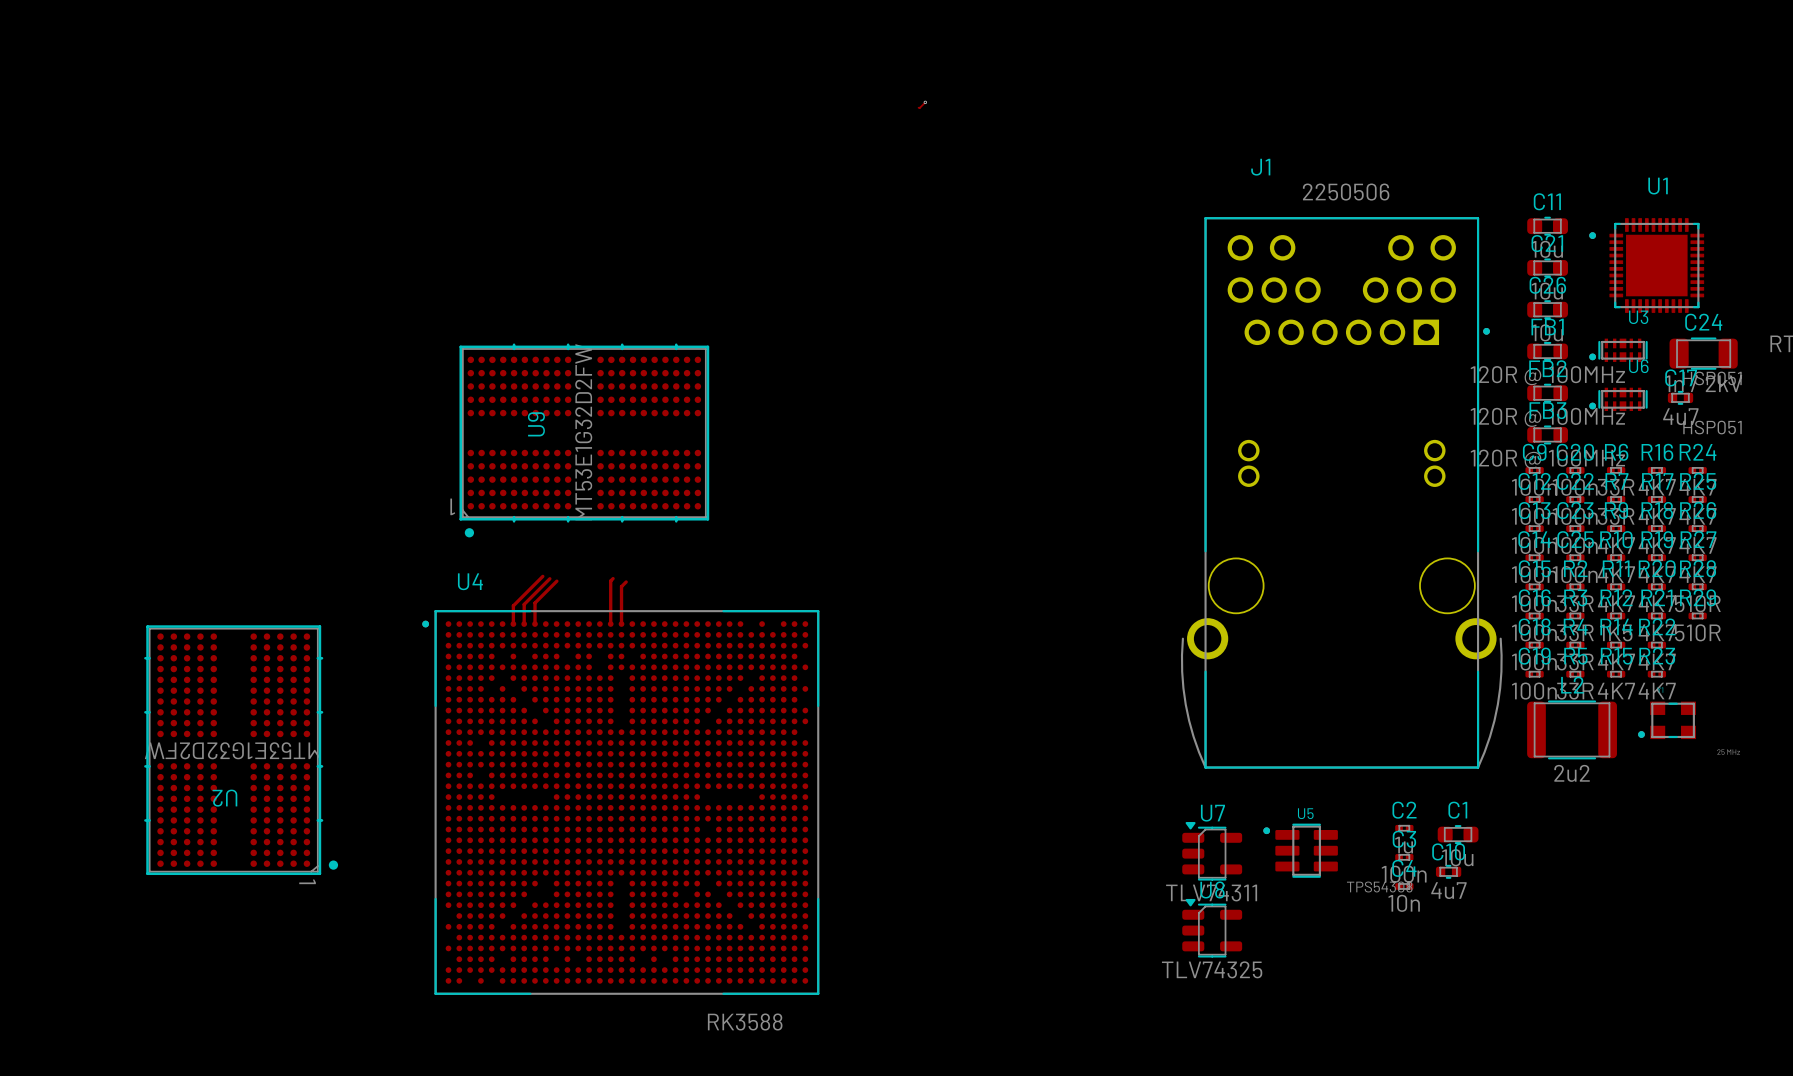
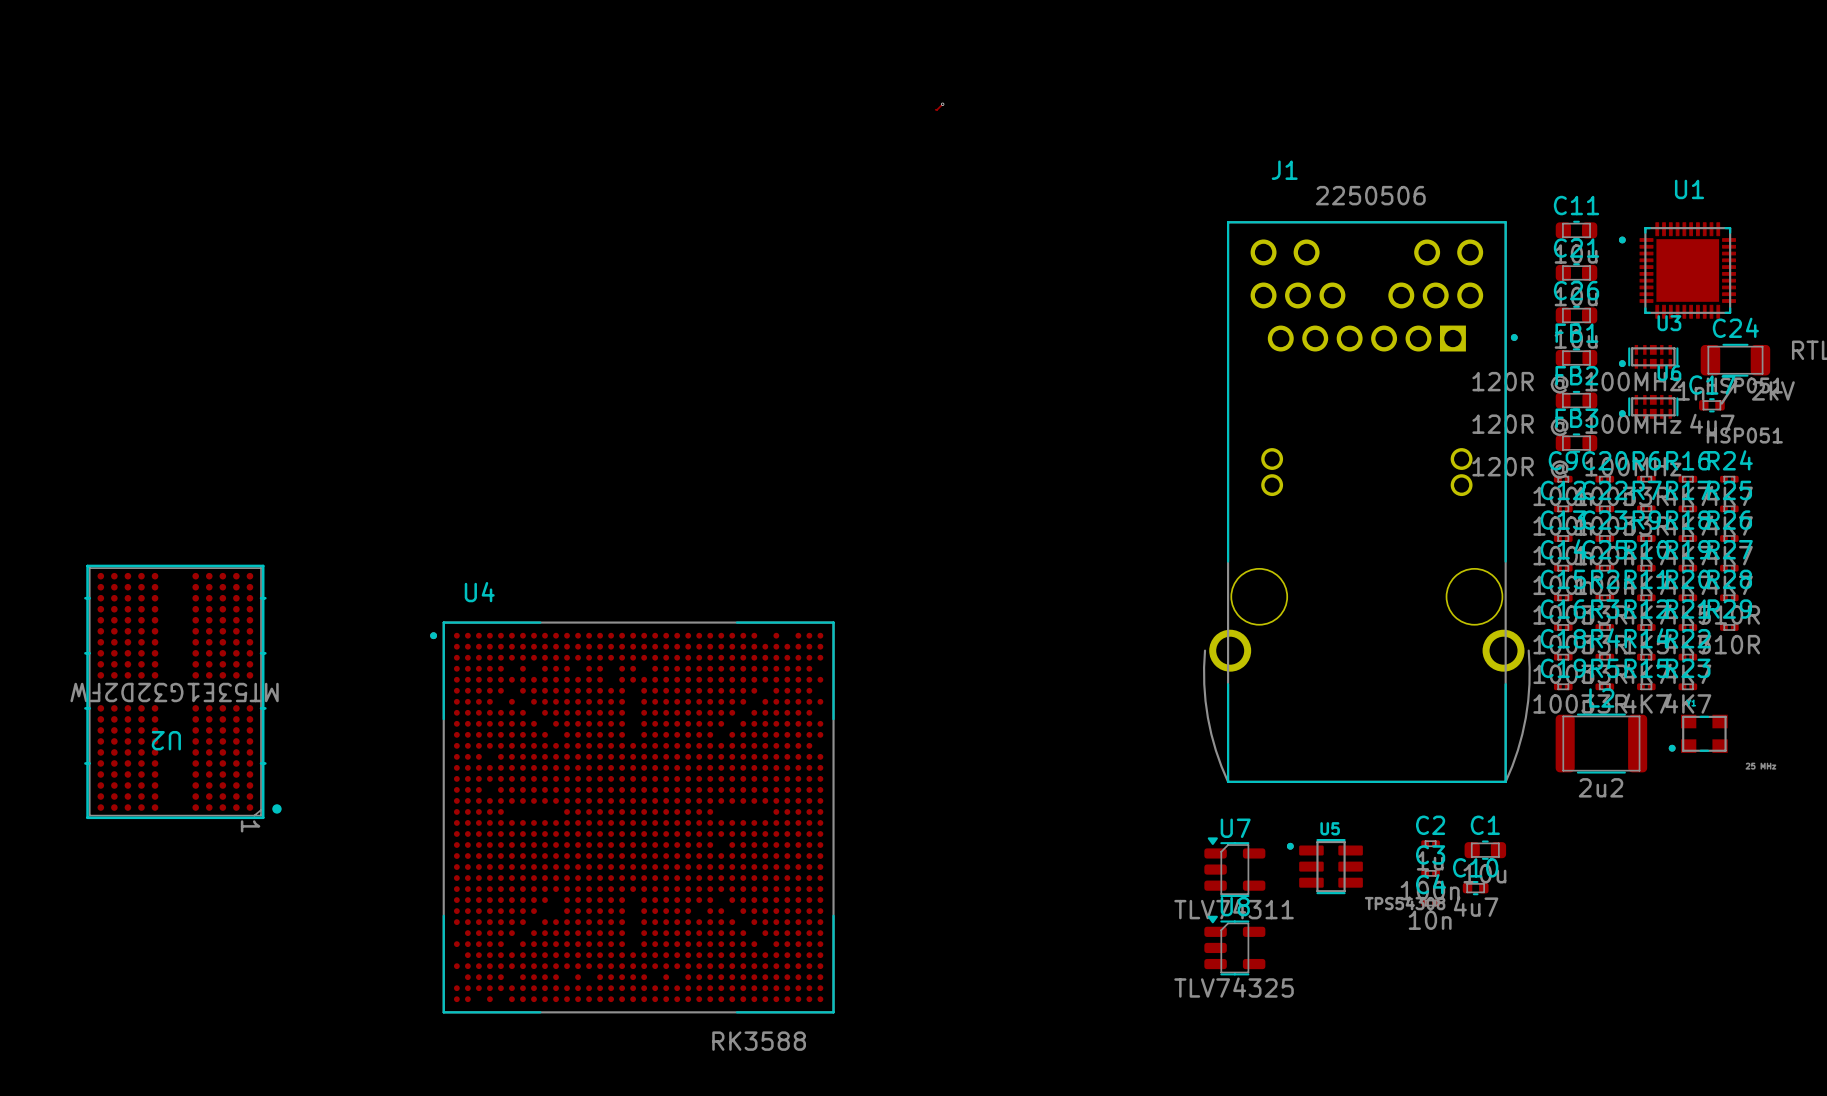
U9: MT53E1G32D2FW (584, 440) -> none
top track: (542, 576) (513, 605) (513, 624) -> none
top track: (549, 578) (524, 604) (524, 624) -> none
top track: (613, 578) (610, 580) (610, 624) -> none
top track: (556, 581) (535, 603) (535, 624) -> none
top track: (626, 581) (621, 586) (621, 624) -> none
U2 position: (241, 750) -> (182, 691)

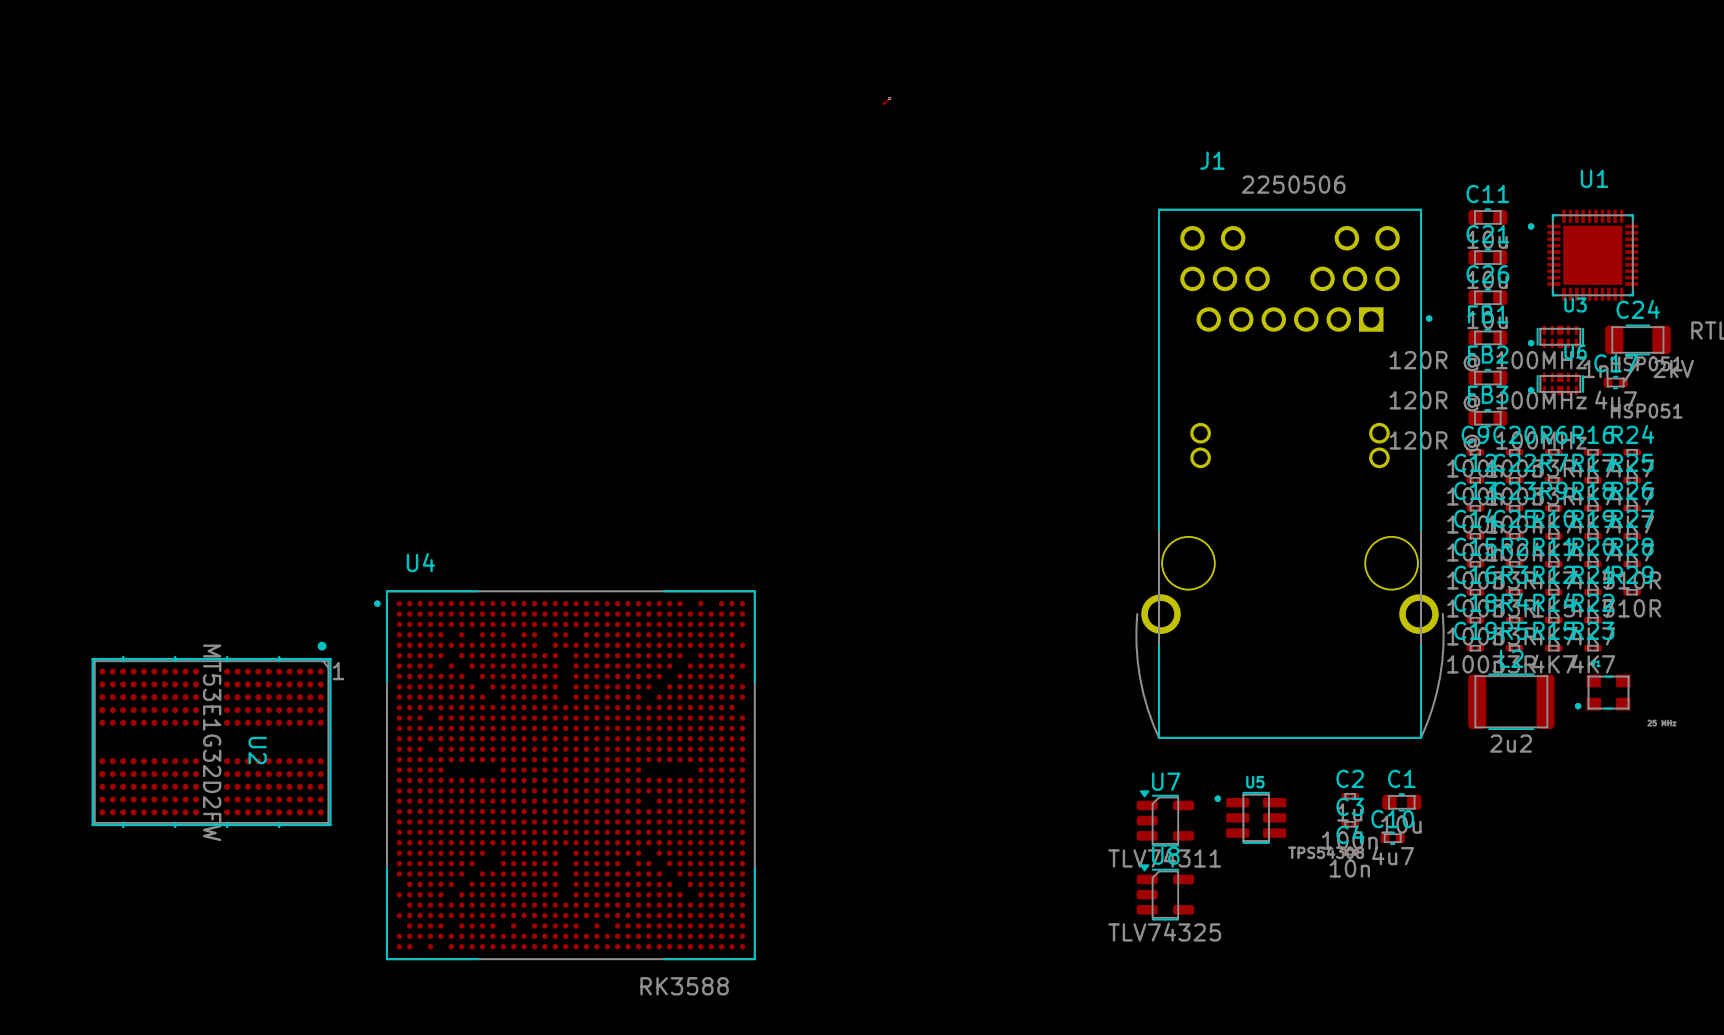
U2 rotation: 0° (182, 691) -> 90° counterclockwise (211, 734)
U4 position: (632, 817) -> (564, 775)

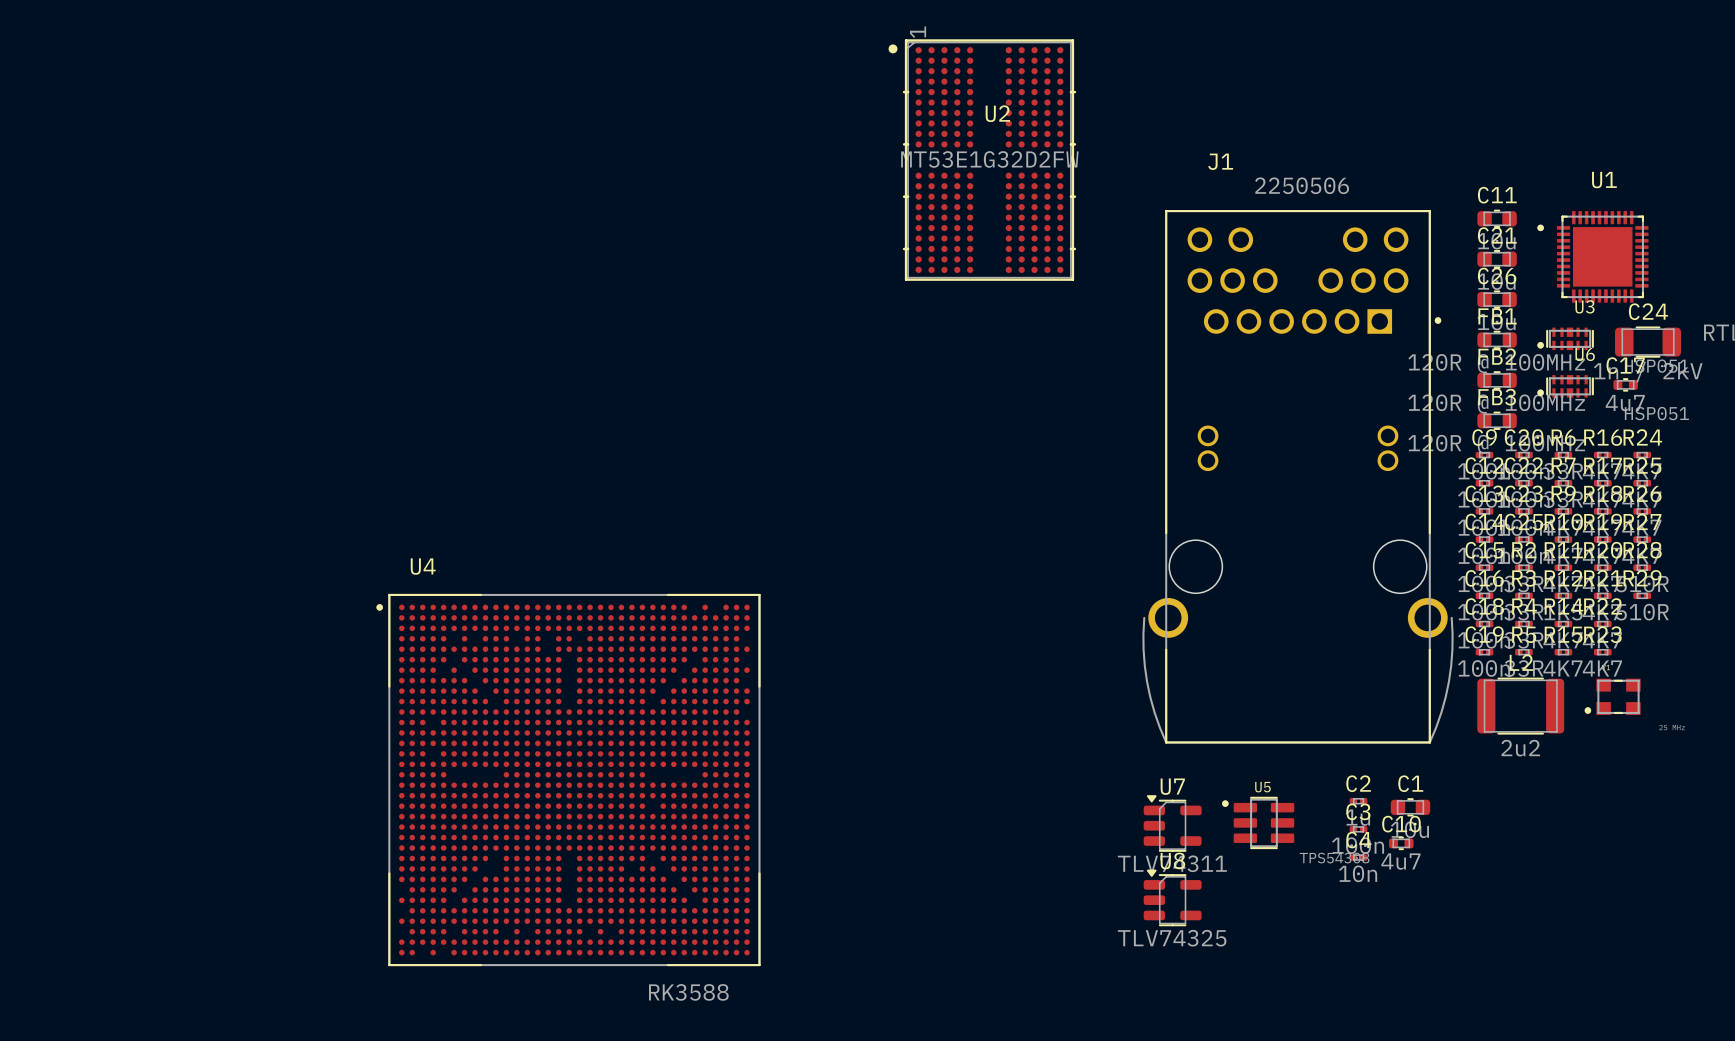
top track: (889, 98) (883, 103) -> none
via: (889, 98) -> none
U2 rotation: 0° (211, 734) -> 90° counterclockwise (982, 160)
U2 position: (211, 734) -> (982, 160)

